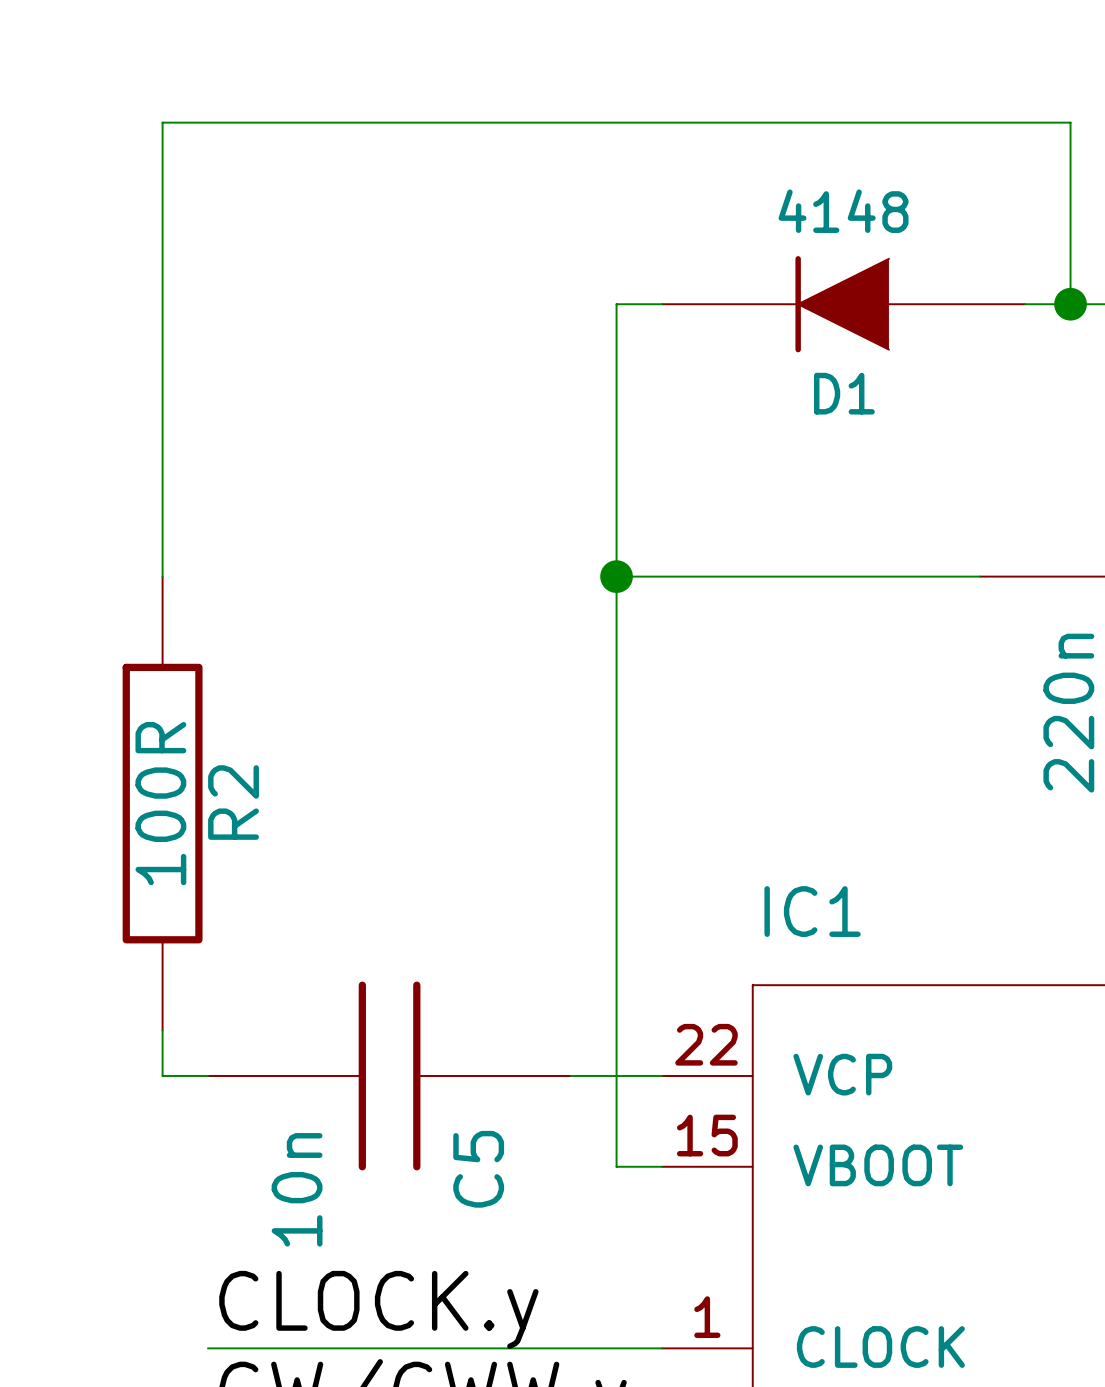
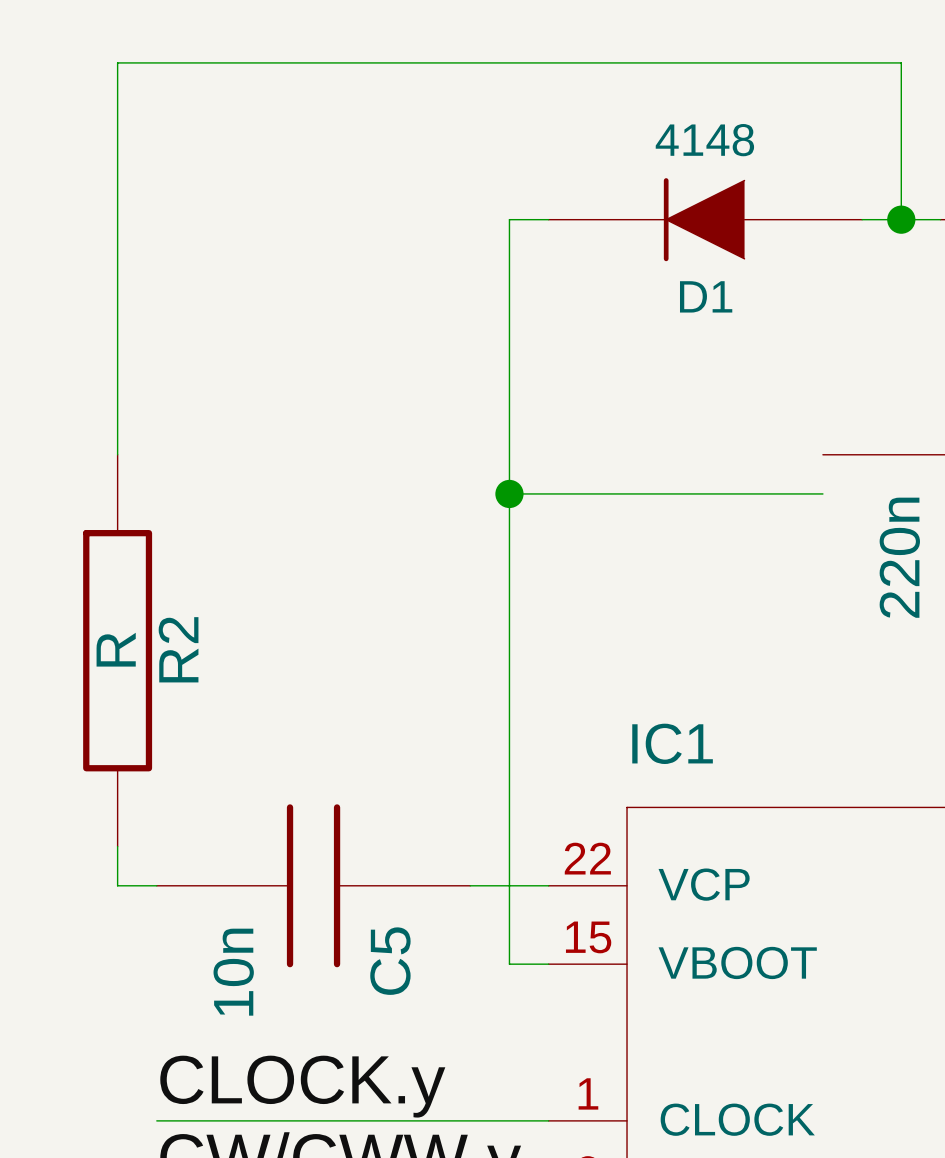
wire: (616, 576) (979, 576) -> (509, 493) (822, 493)
junction position: (616, 576) -> (509, 493)
R2 value: 100R (160, 803) -> R (116, 649)

